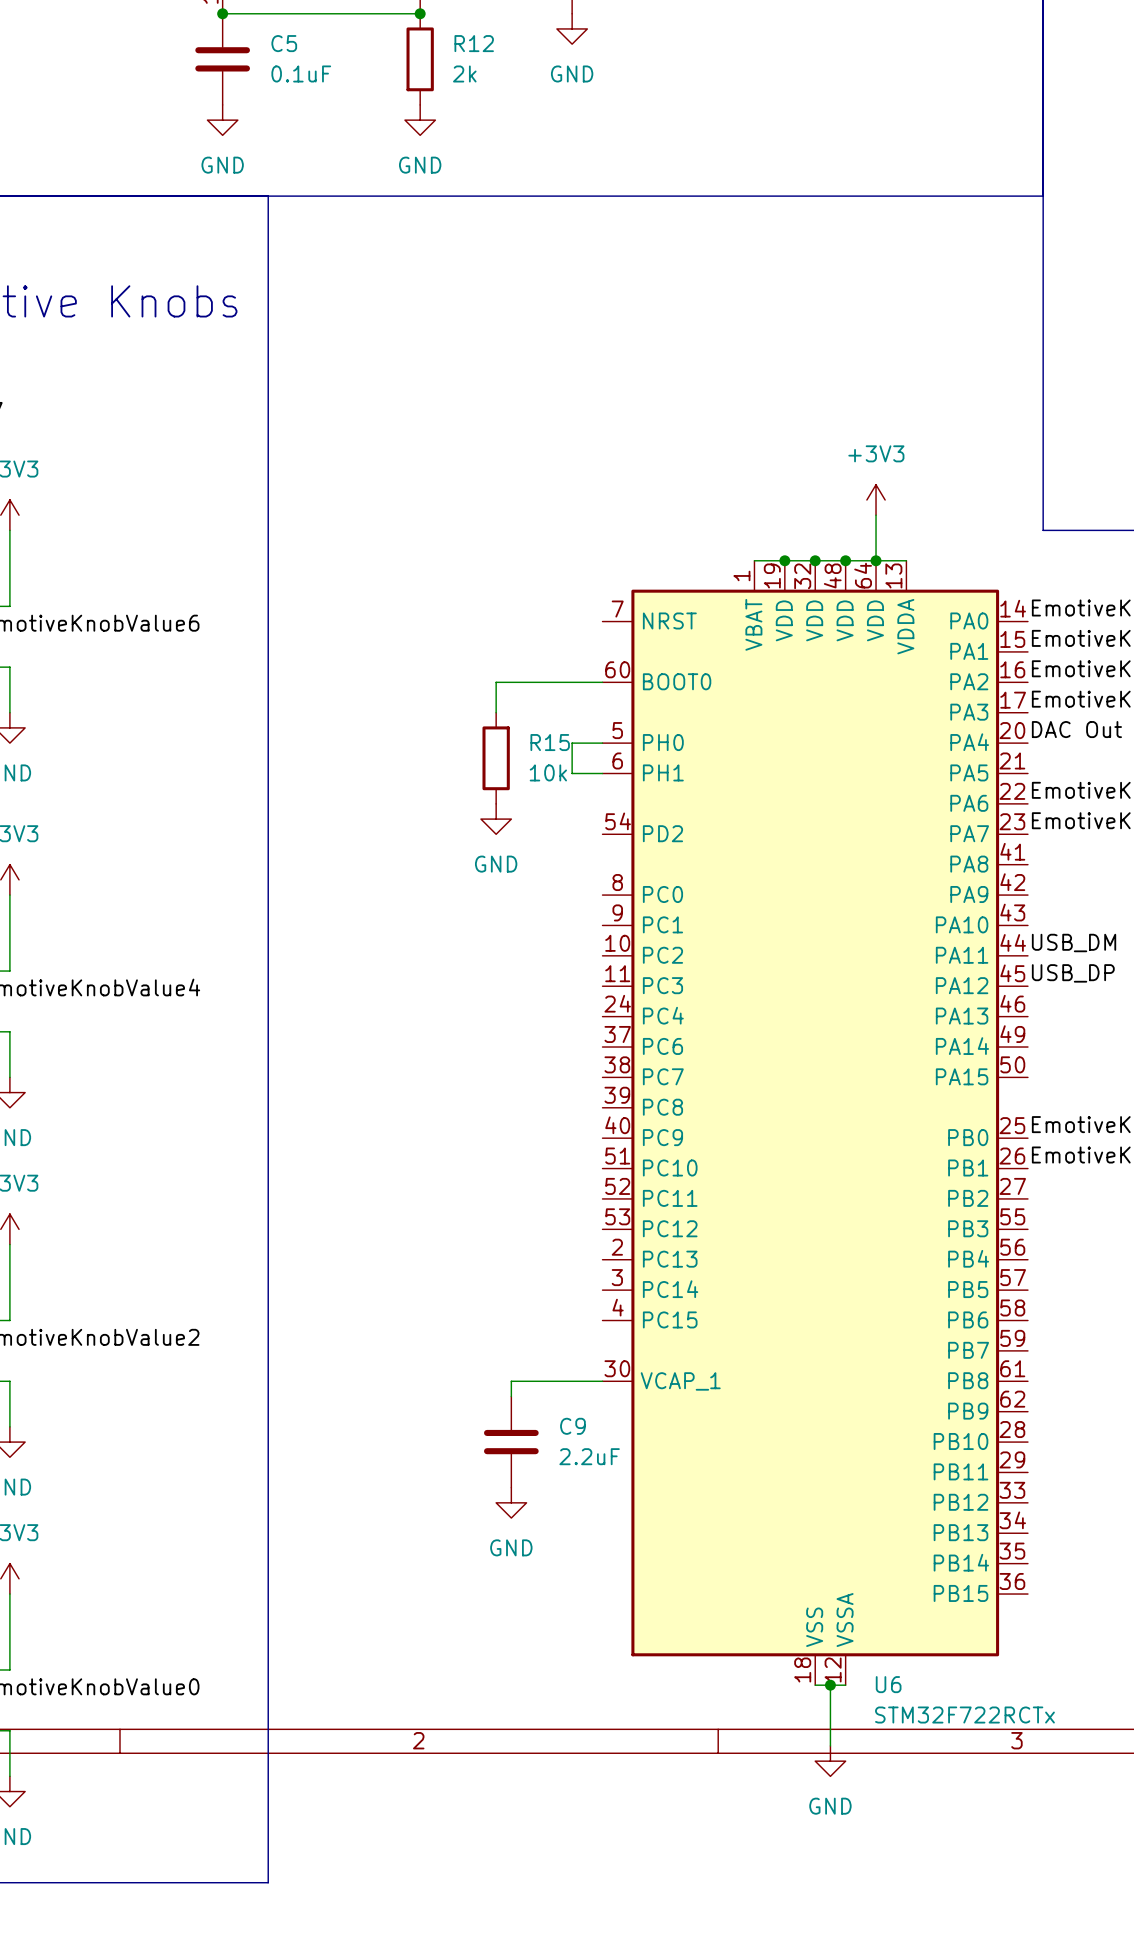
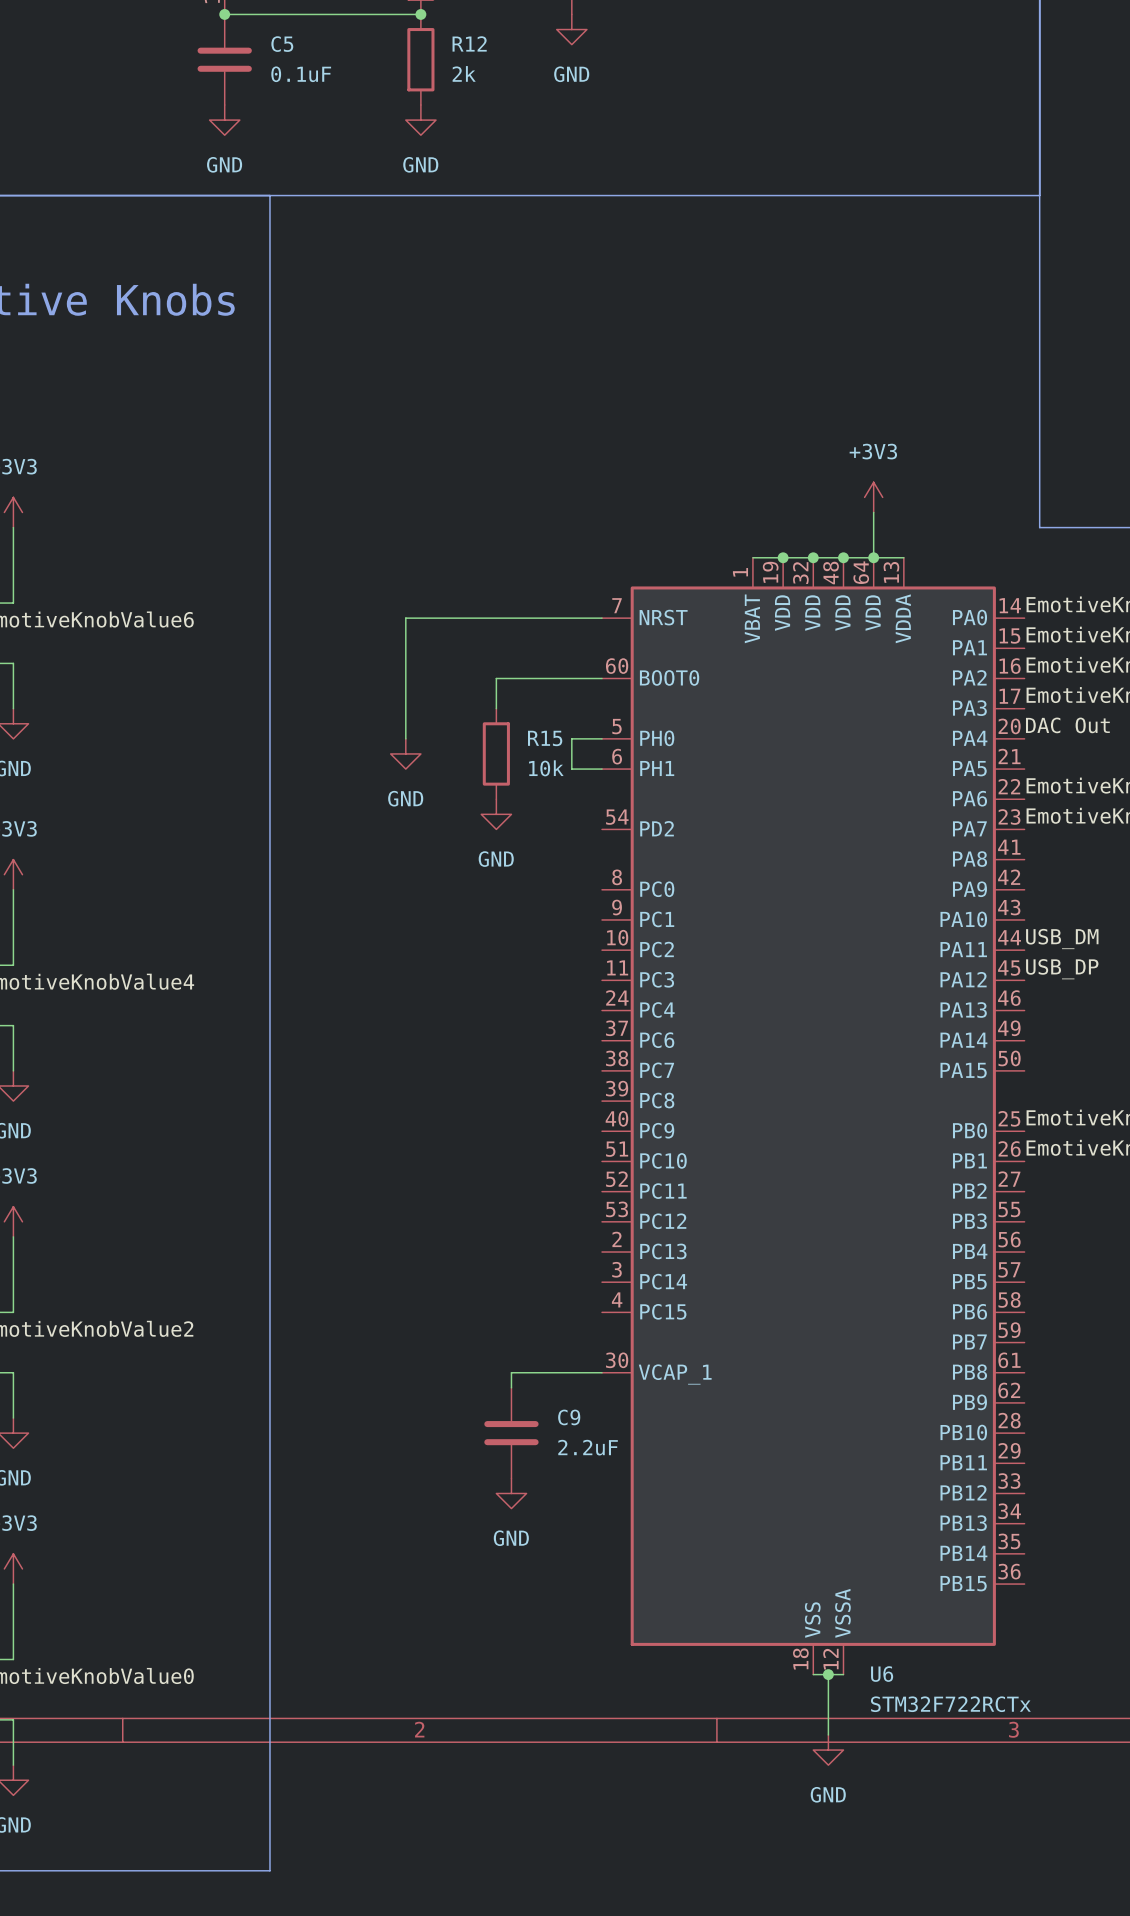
wire: none -> (602, 618) (405, 618) (405, 738)
power symbol: none -> GND (405, 753)

